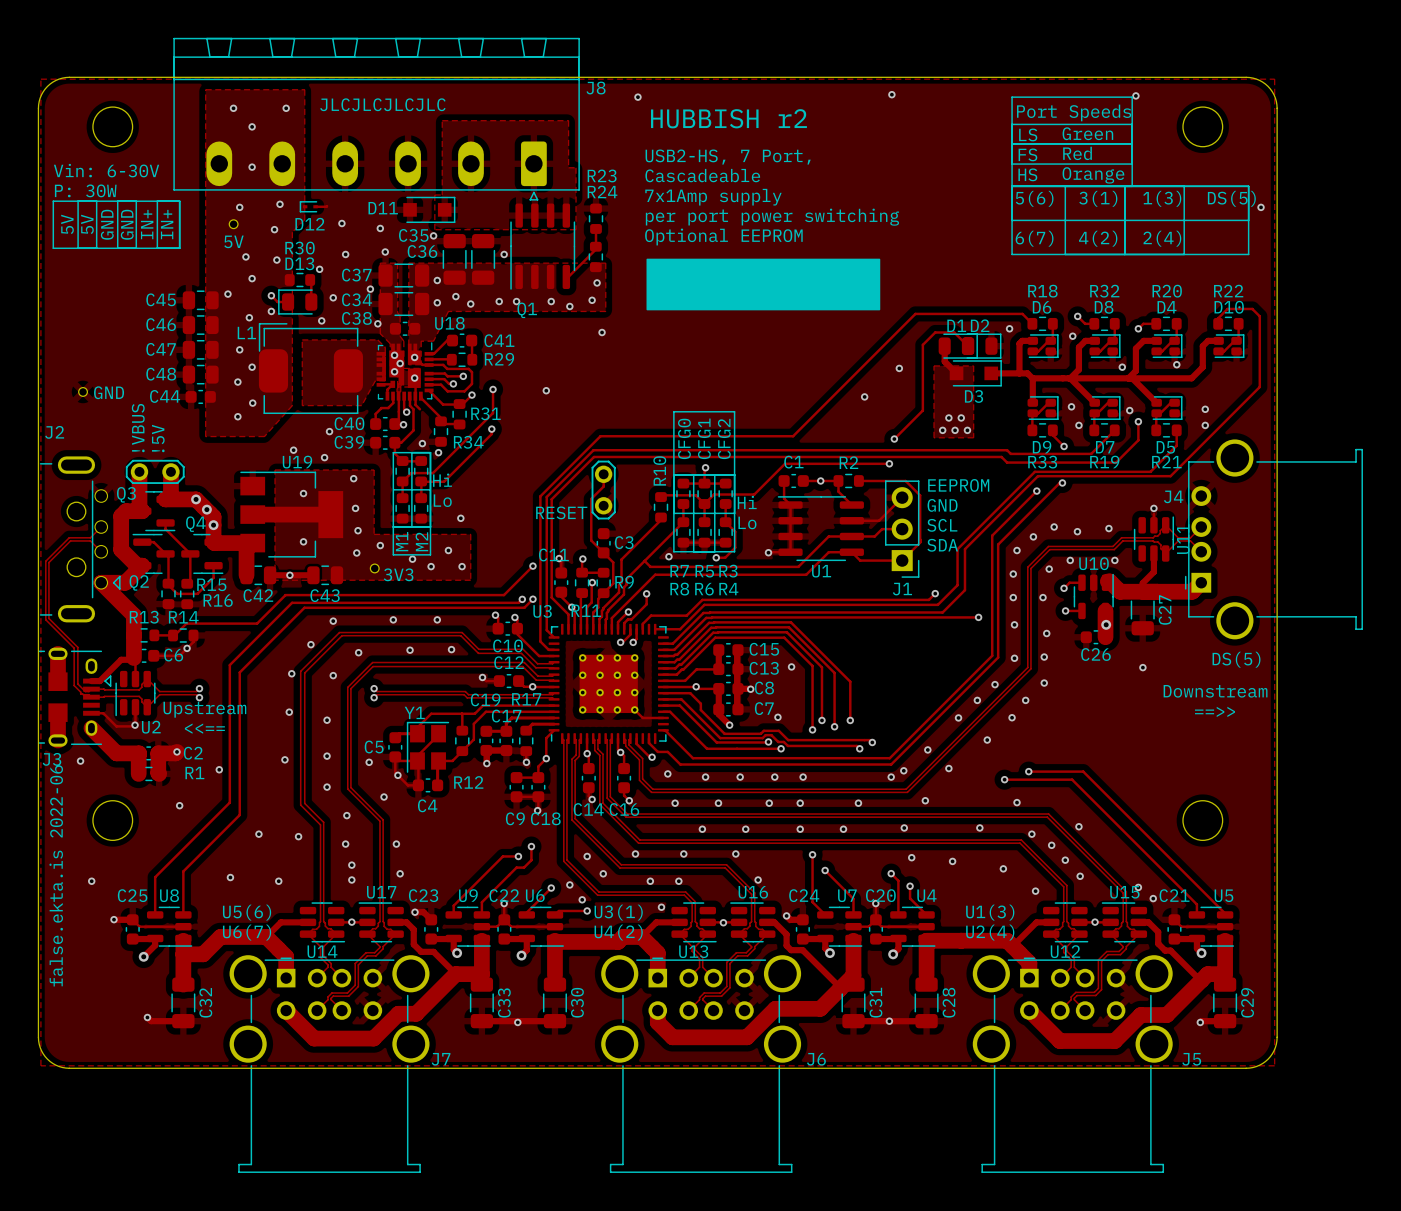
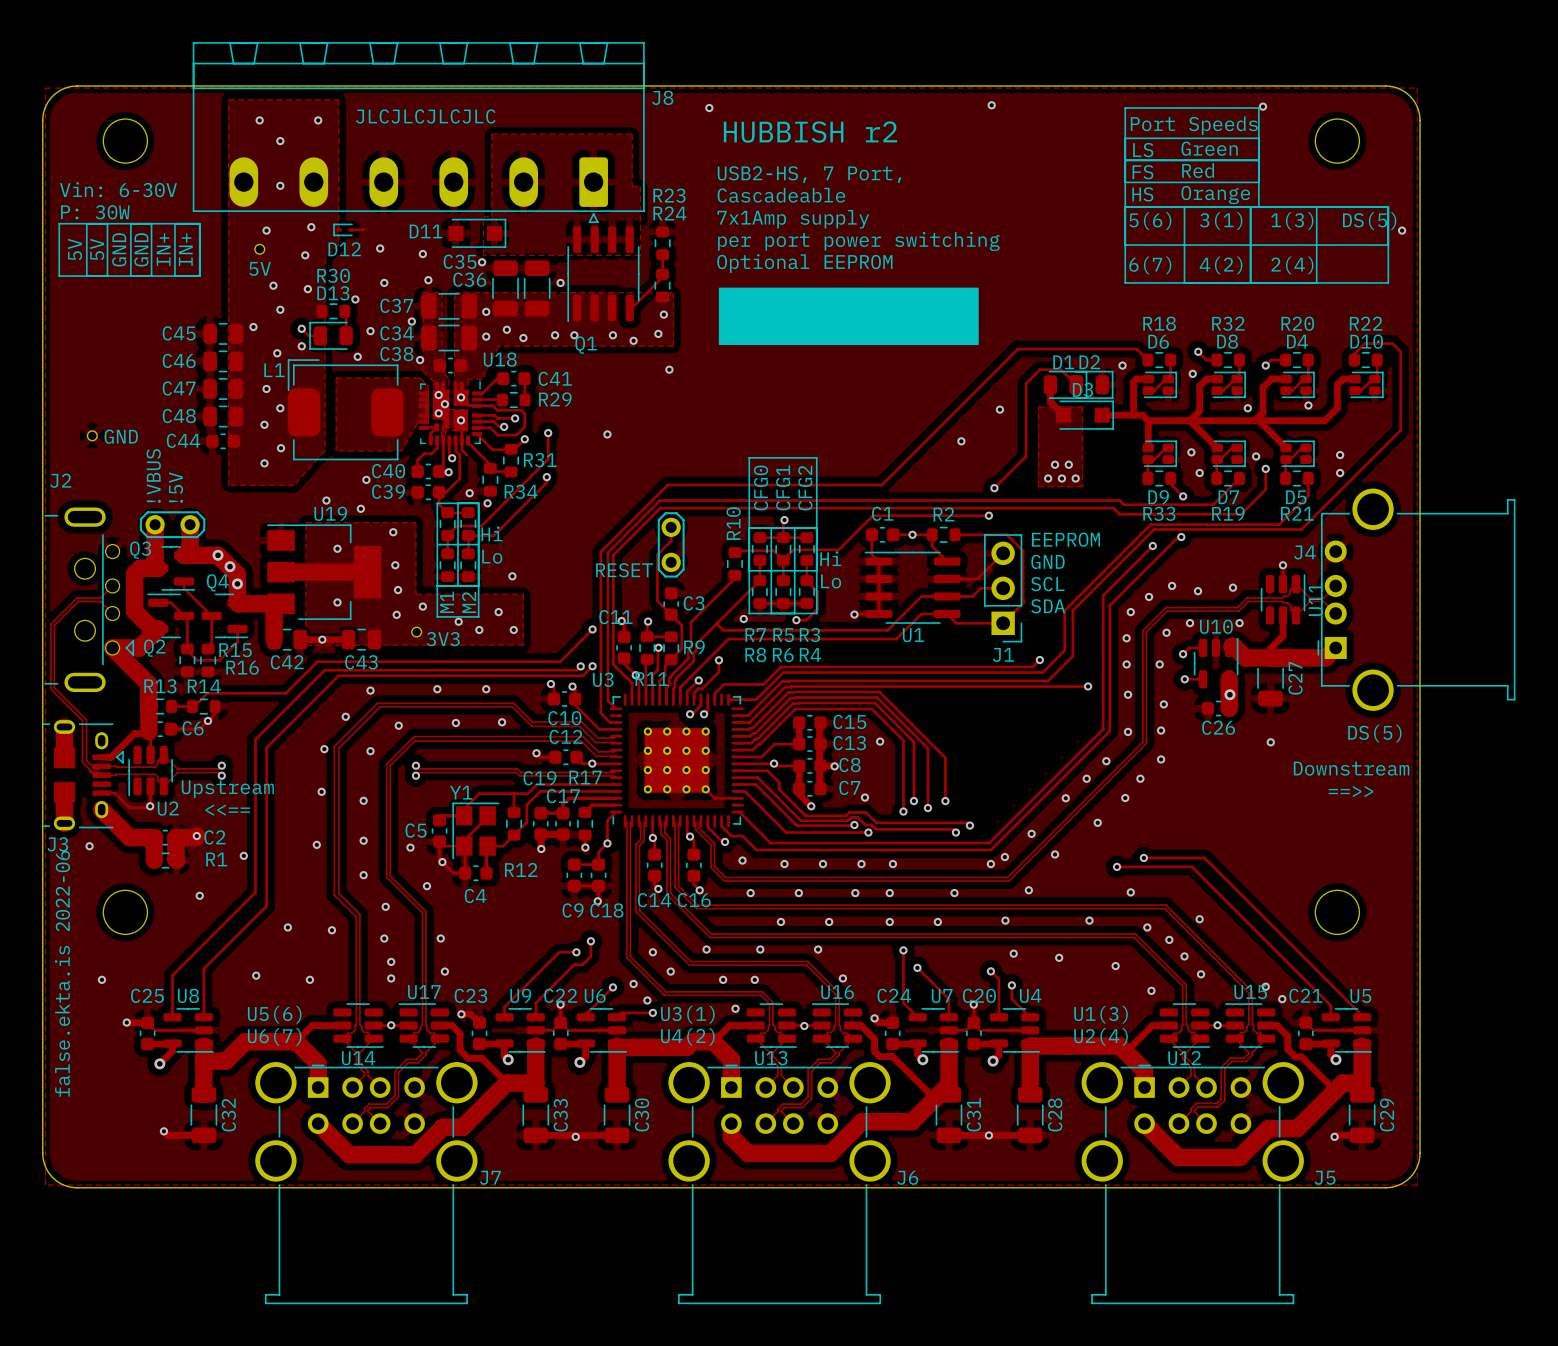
D3 name position: D3 (974, 396) -> D3 (1082, 389)

